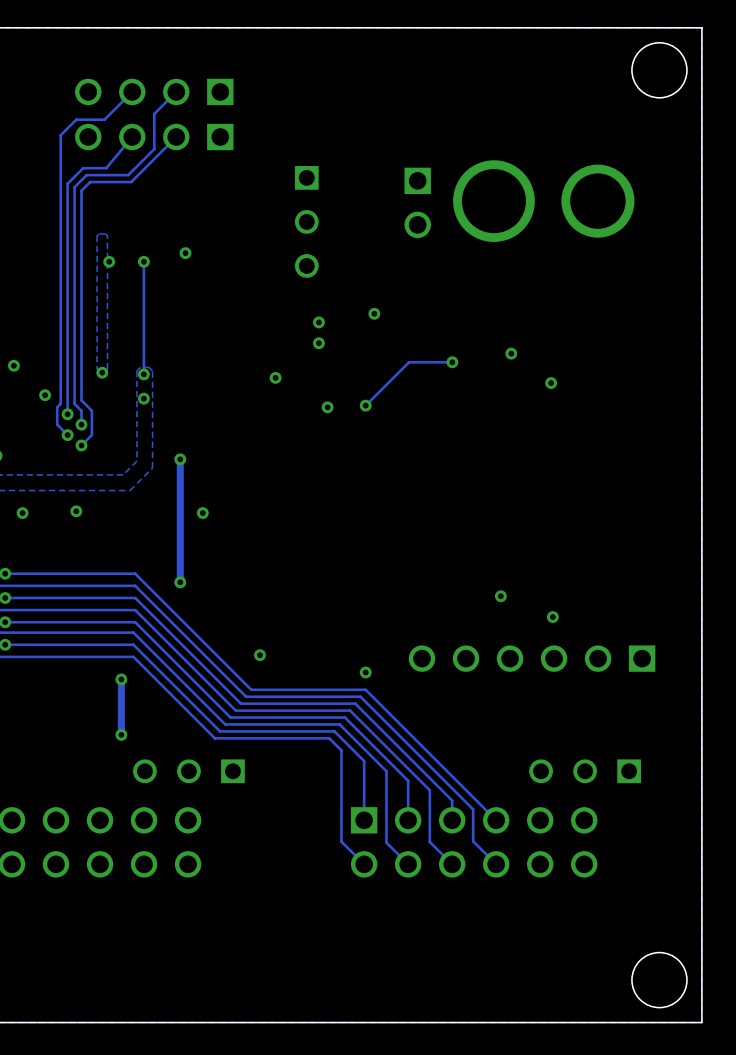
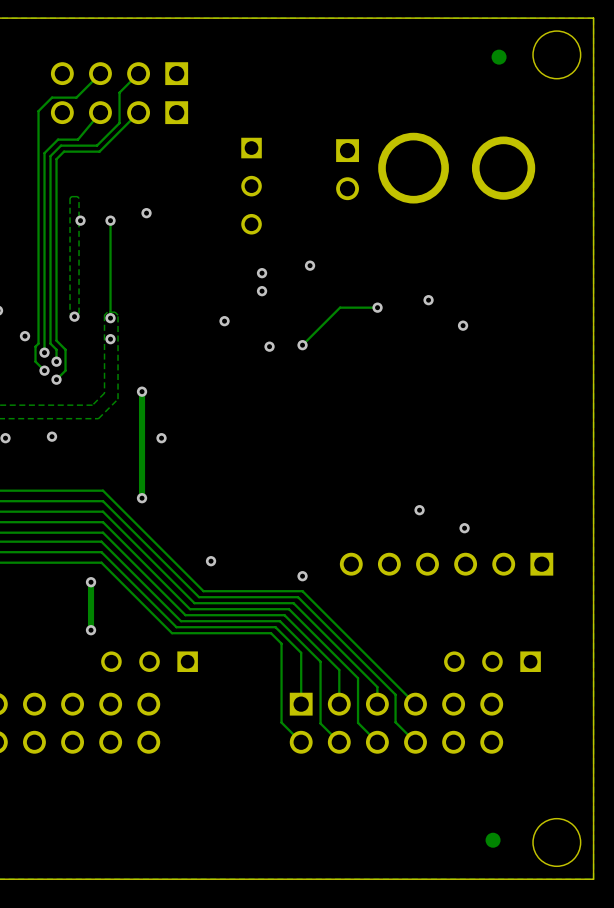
part: none -> (499, 57)
part: none -> (493, 840)

